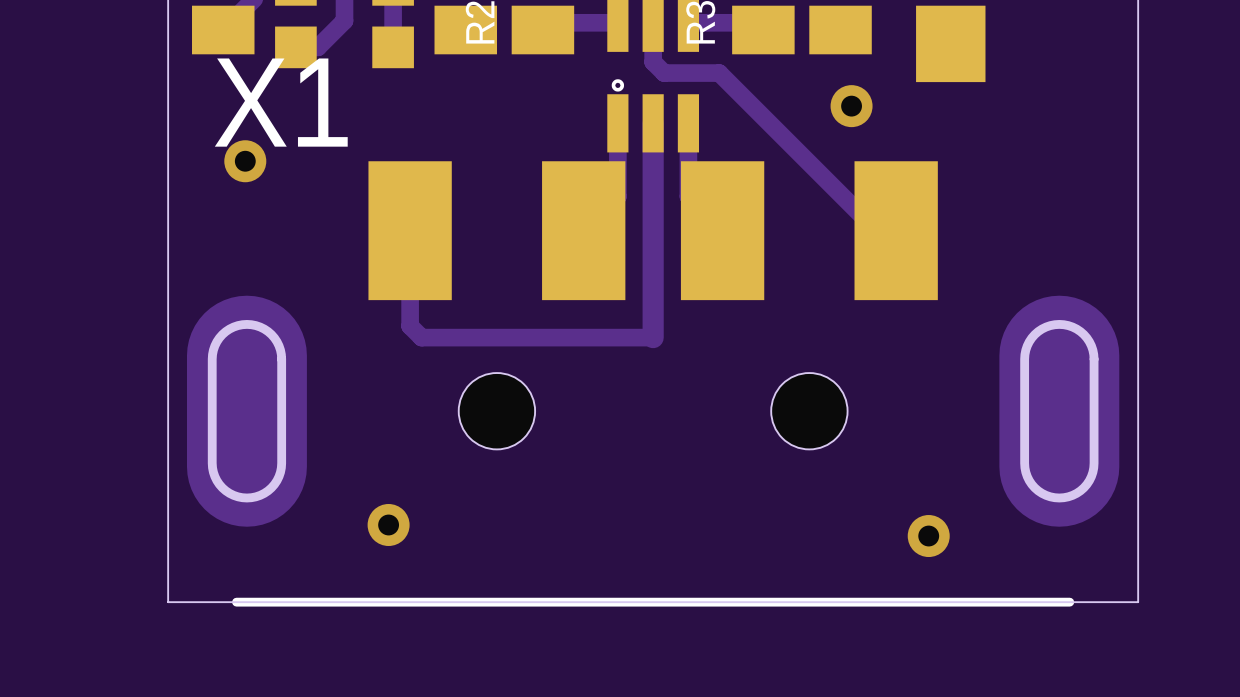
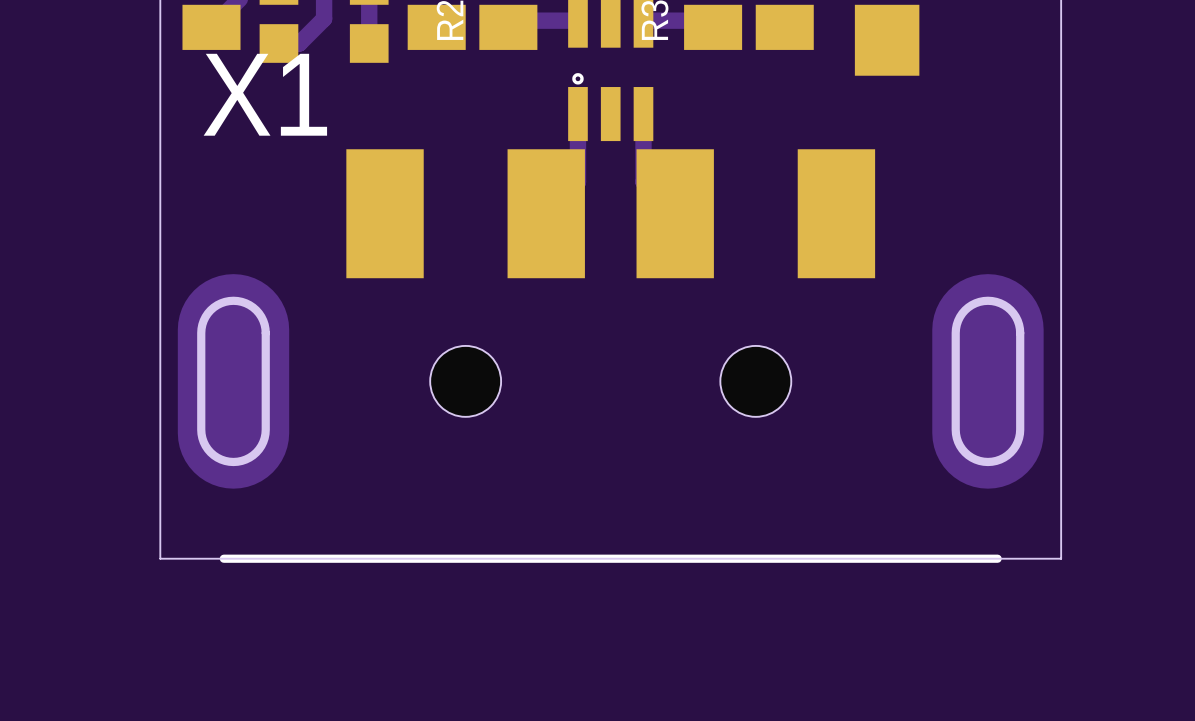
track: (653, 22) (653, 62) (664, 73) (719, 73) (876, 230) (896, 230) -> none
via: (851, 106) -> none
track: (653, 123) (653, 337) (421, 337) (410, 326) (410, 230) -> none
via: (245, 161) -> none
via: (388, 525) -> none
via: (928, 536) -> none

